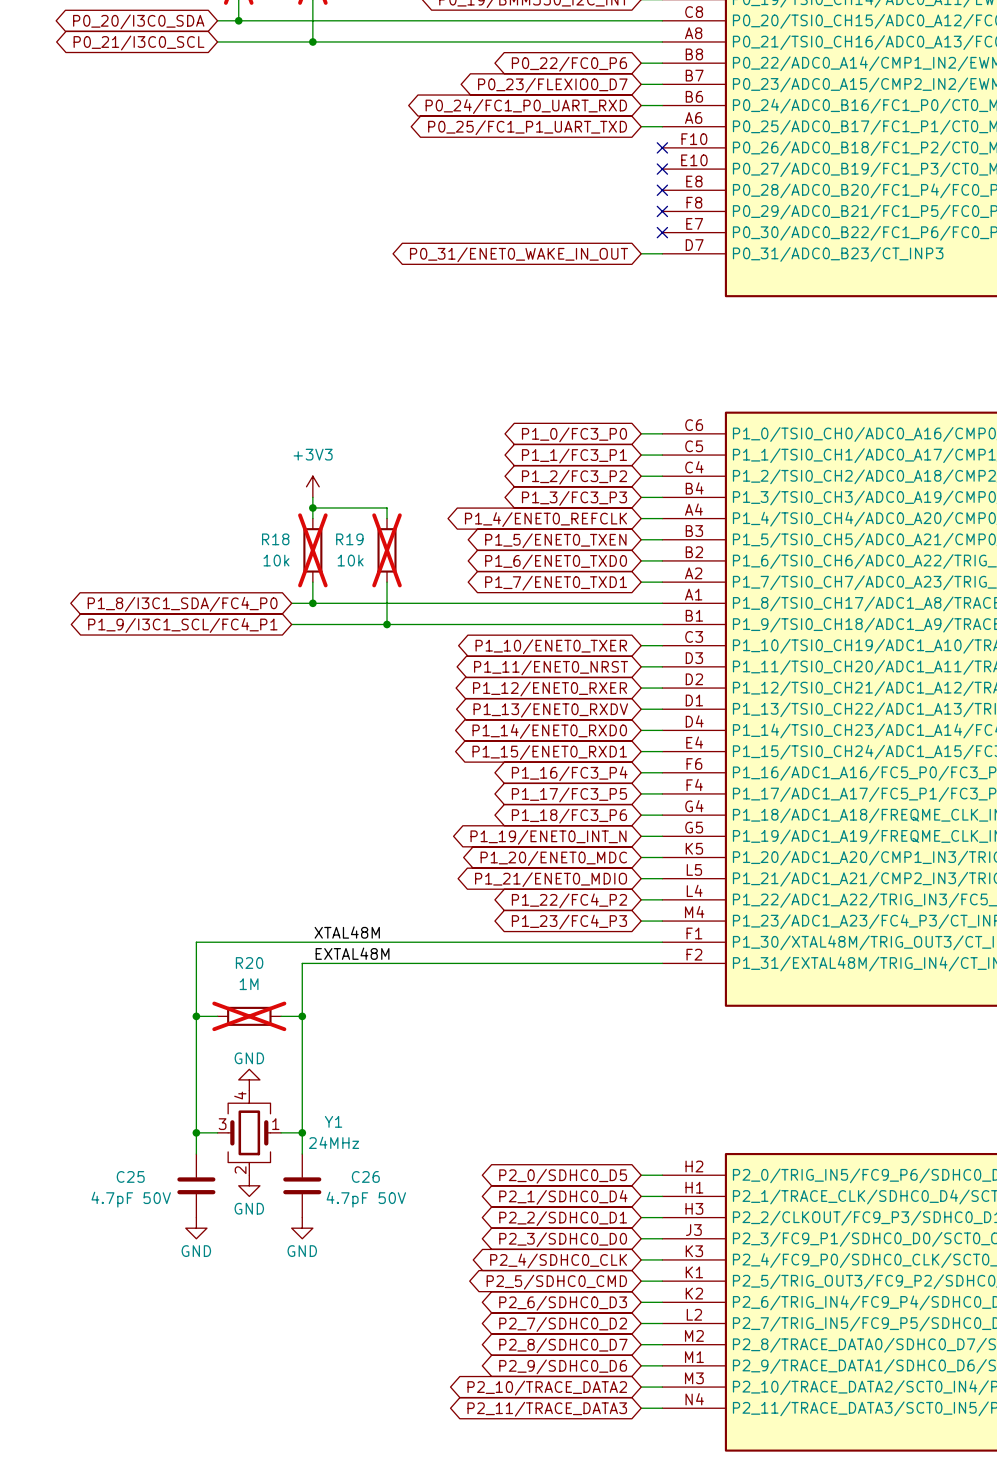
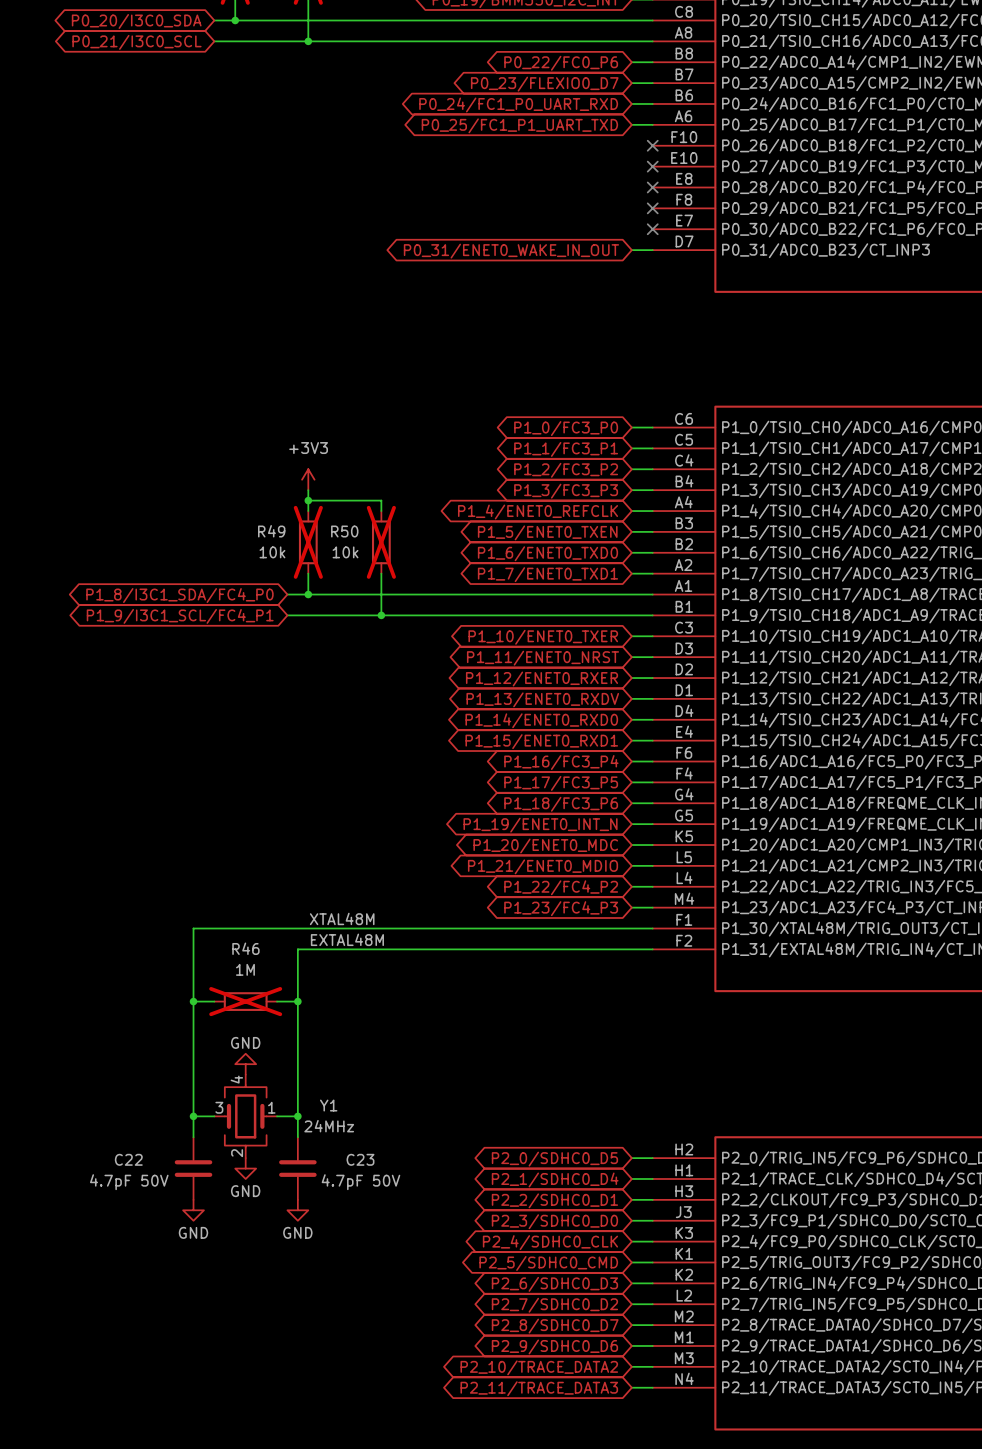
R18 name: R18 (275, 539) -> R49 (271, 531)
R19 name: R19 (349, 539) -> R50 (344, 531)
R20 name: R20 (249, 963) -> R46 (245, 948)
C25 name: C25 (130, 1176) -> C22 (128, 1159)
C26 name: C26 (365, 1176) -> C23 (360, 1159)

